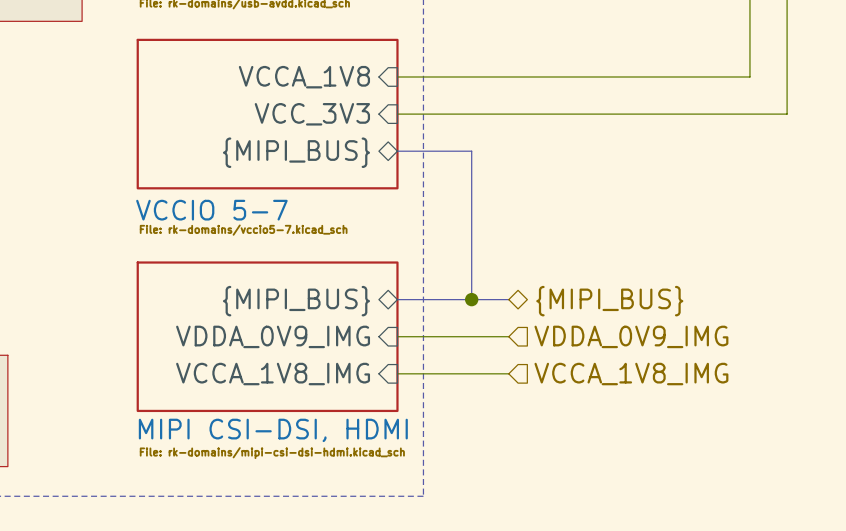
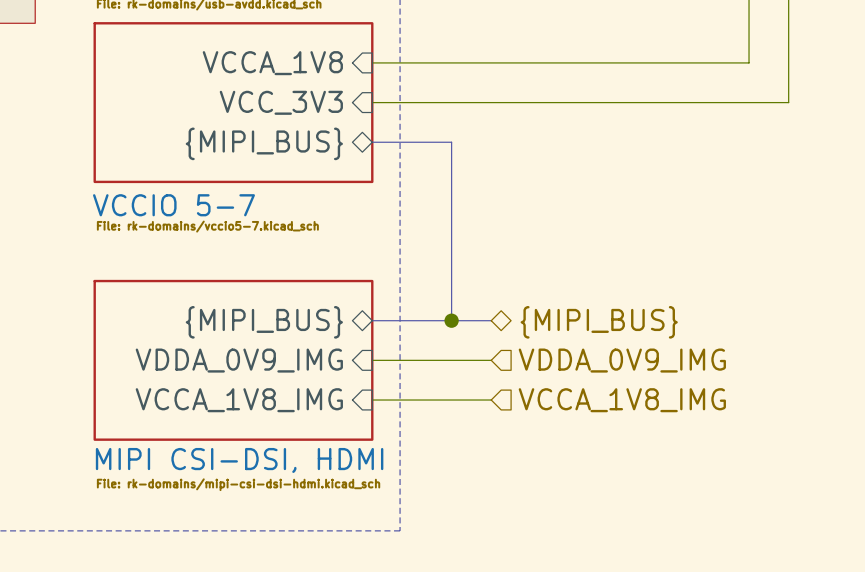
wire: (749, 58) (749, 76) (397, 76) -> (749, 62) (372, 62)
sheet pin position: VCCA_1V8 (304, 77) -> VCCA_1V8 (272, 63)
wire: (787, 95) (787, 114) (397, 114) -> (788, 102) (372, 102)
sheet VCCIO 5-7 position: (267, 114) -> (233, 102)
sheet pin position: VCC_3V3 (312, 114) -> VCC_3V3 (281, 102)
bus: (397, 151) (471, 151) -> (372, 142) (451, 142) (451, 162)
sheet pin position: {MIPI_BUS} (296, 152) -> {MIPI_BUS} (264, 143)

